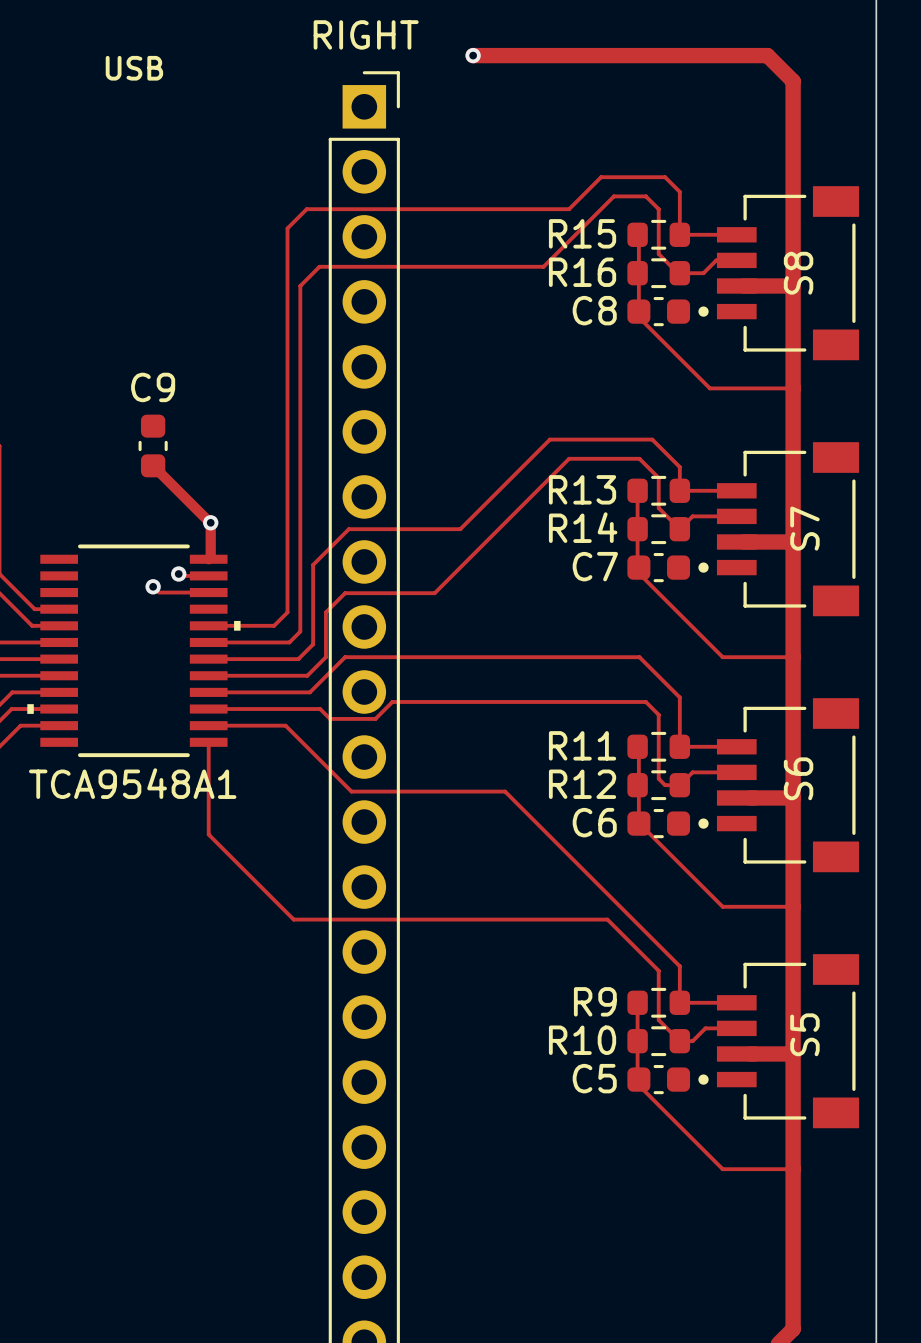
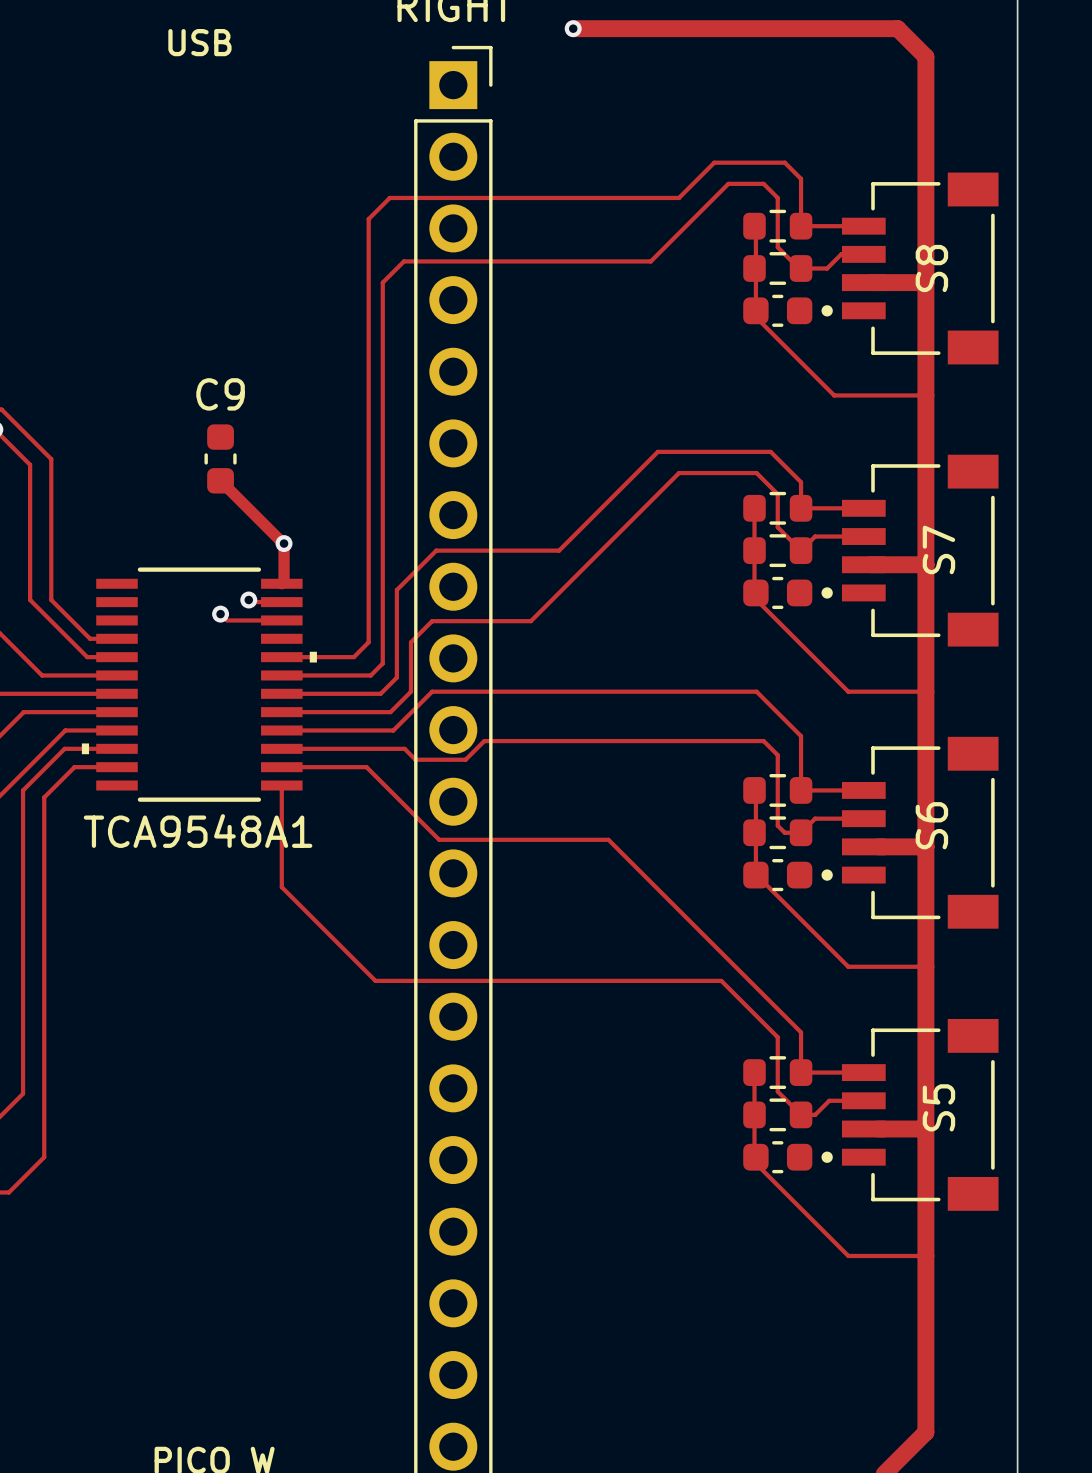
R15 name: R15 (582, 233) -> none
R16 name: R16 (582, 272) -> none
C8 name: C8 (594, 310) -> none
R13 name: R13 (582, 489) -> none
R14 name: R14 (583, 527) -> none
C7 name: C7 (595, 566) -> none
R11 name: R11 (582, 745) -> none
R12 name: R12 (582, 784) -> none
C6 name: C6 (594, 822) -> none
R9 name: R9 (595, 1001) -> none
R10 name: R10 (582, 1040) -> none
C5 name: C5 (594, 1078) -> none

